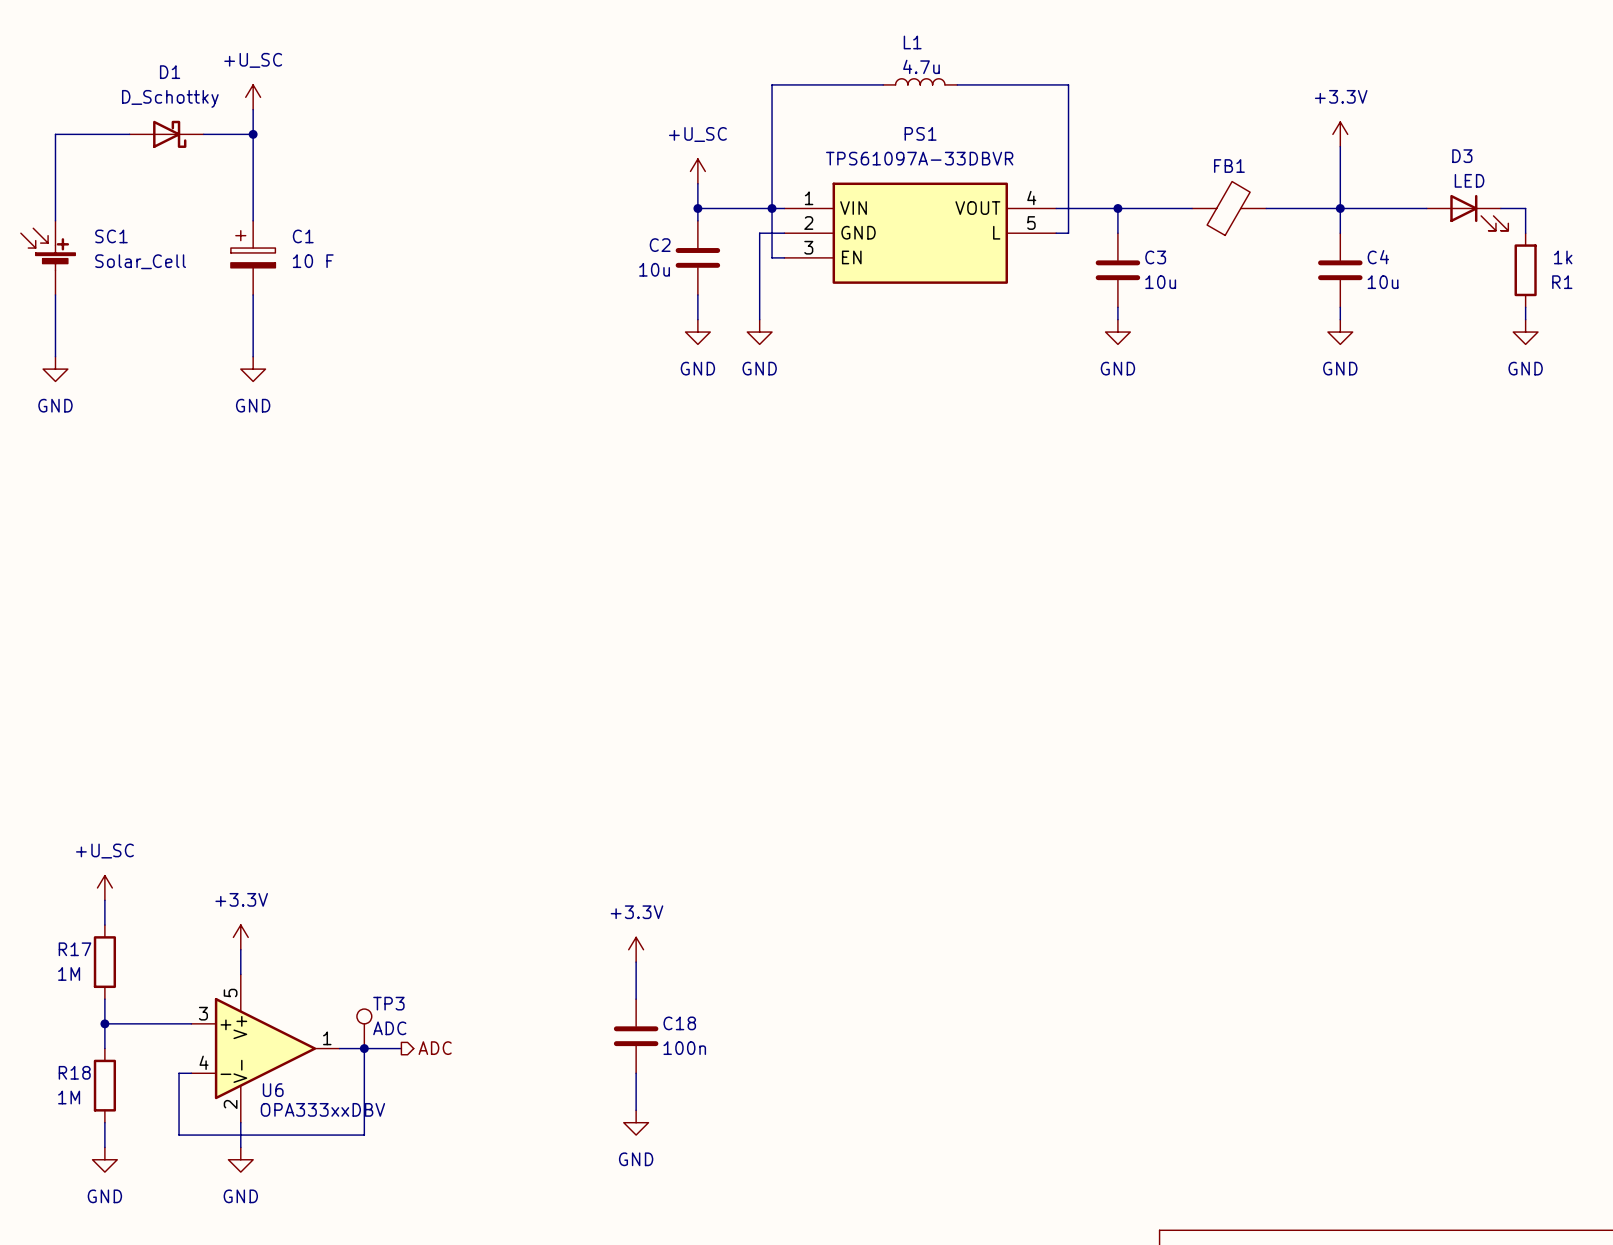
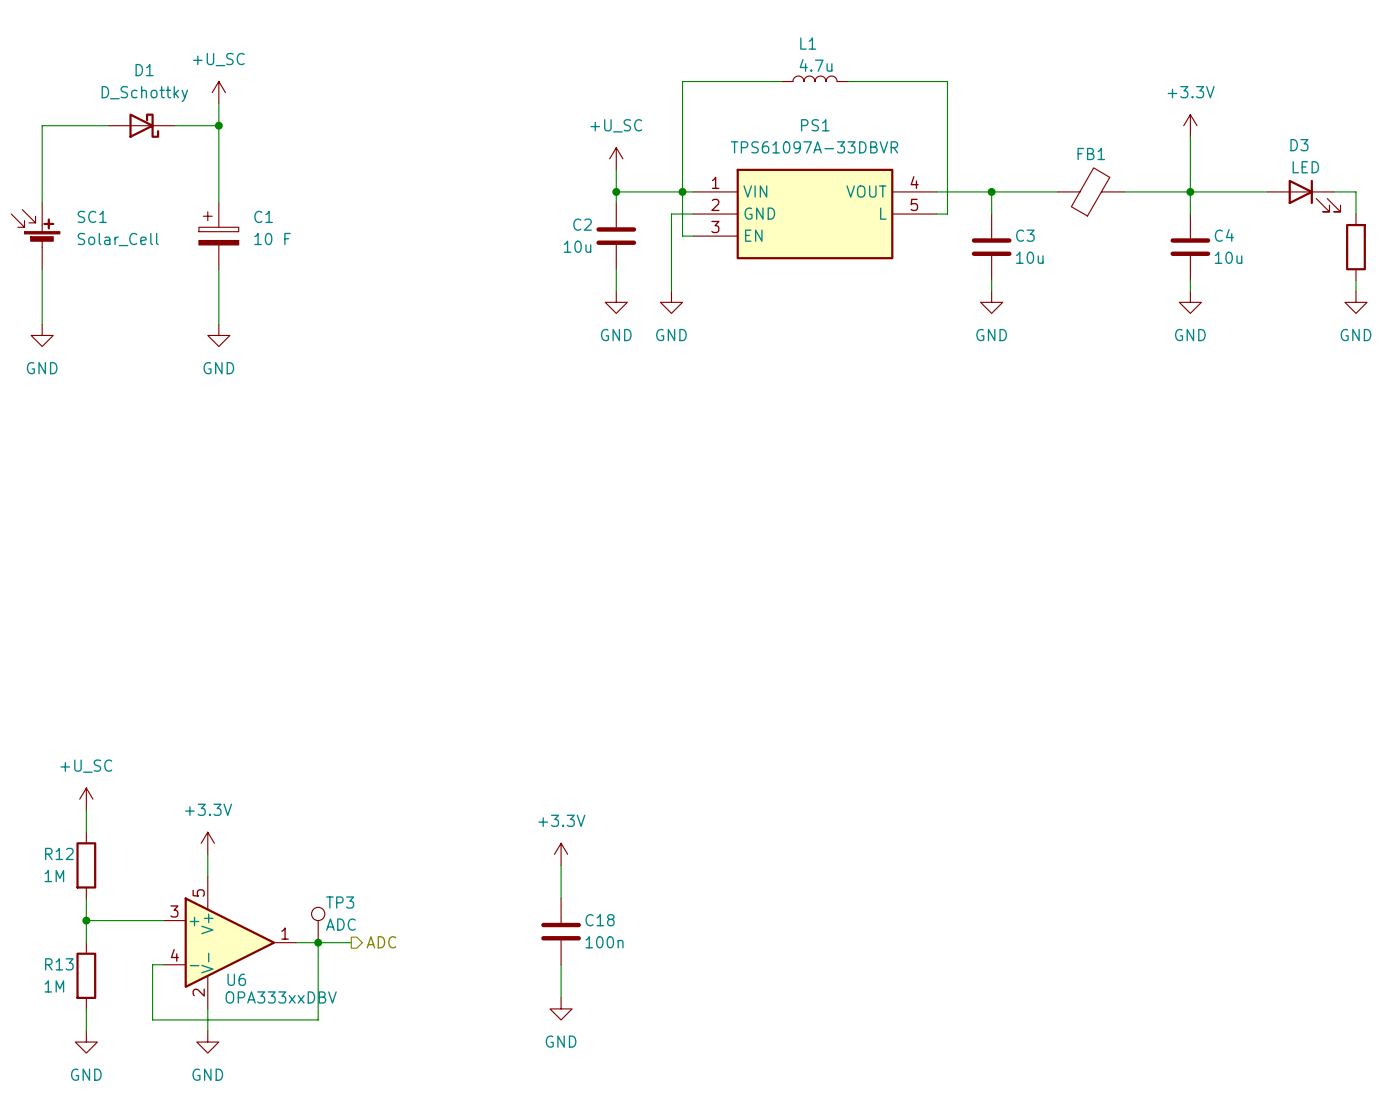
R17 name: R17 (74, 949) -> R12 (59, 853)
R18 name: R18 (74, 1072) -> R13 (59, 964)

